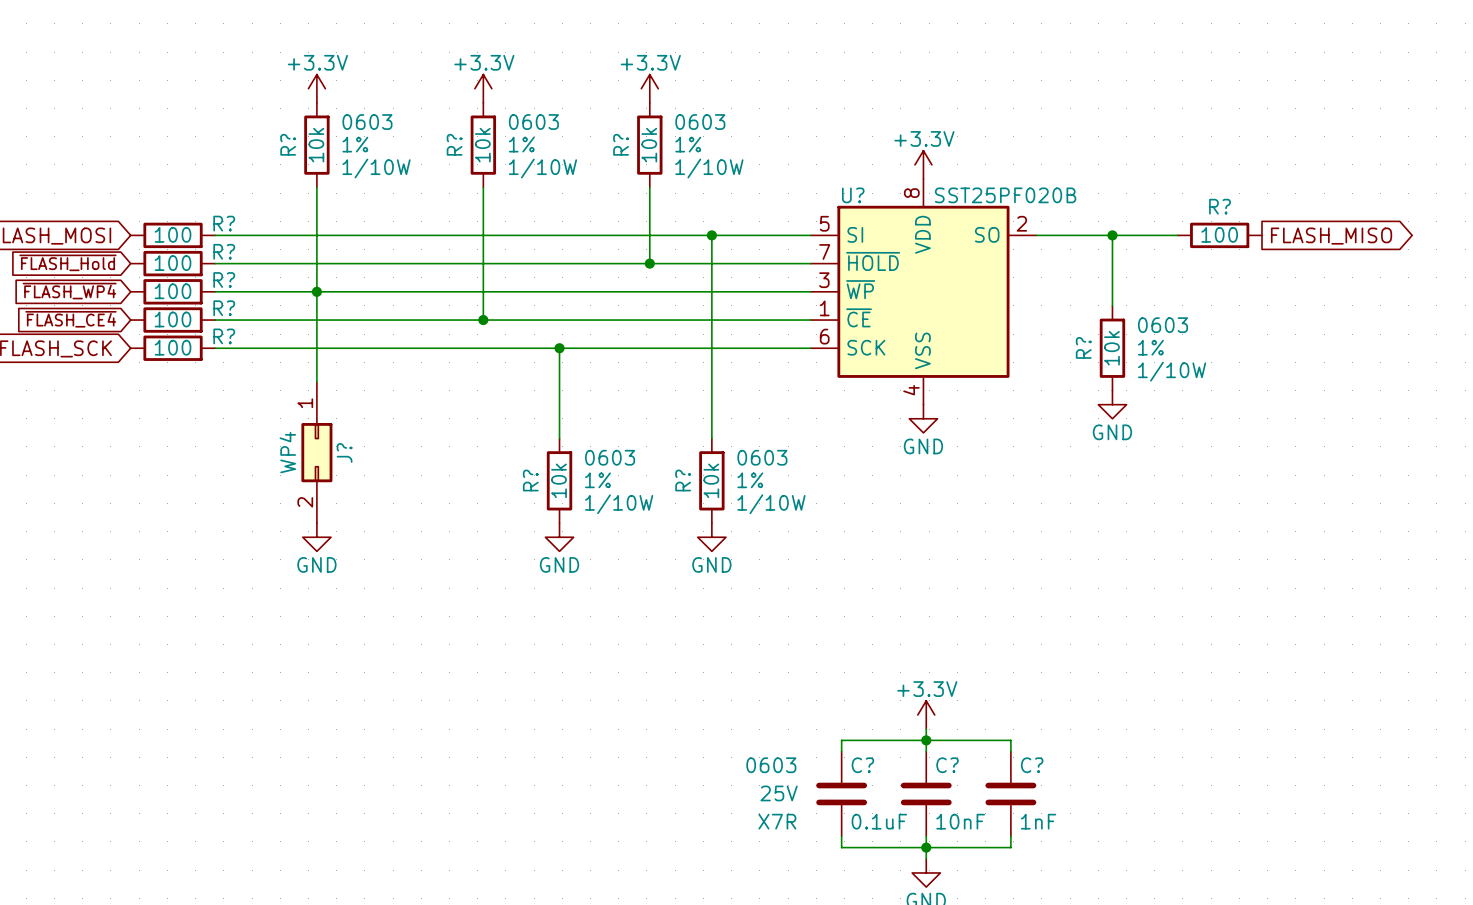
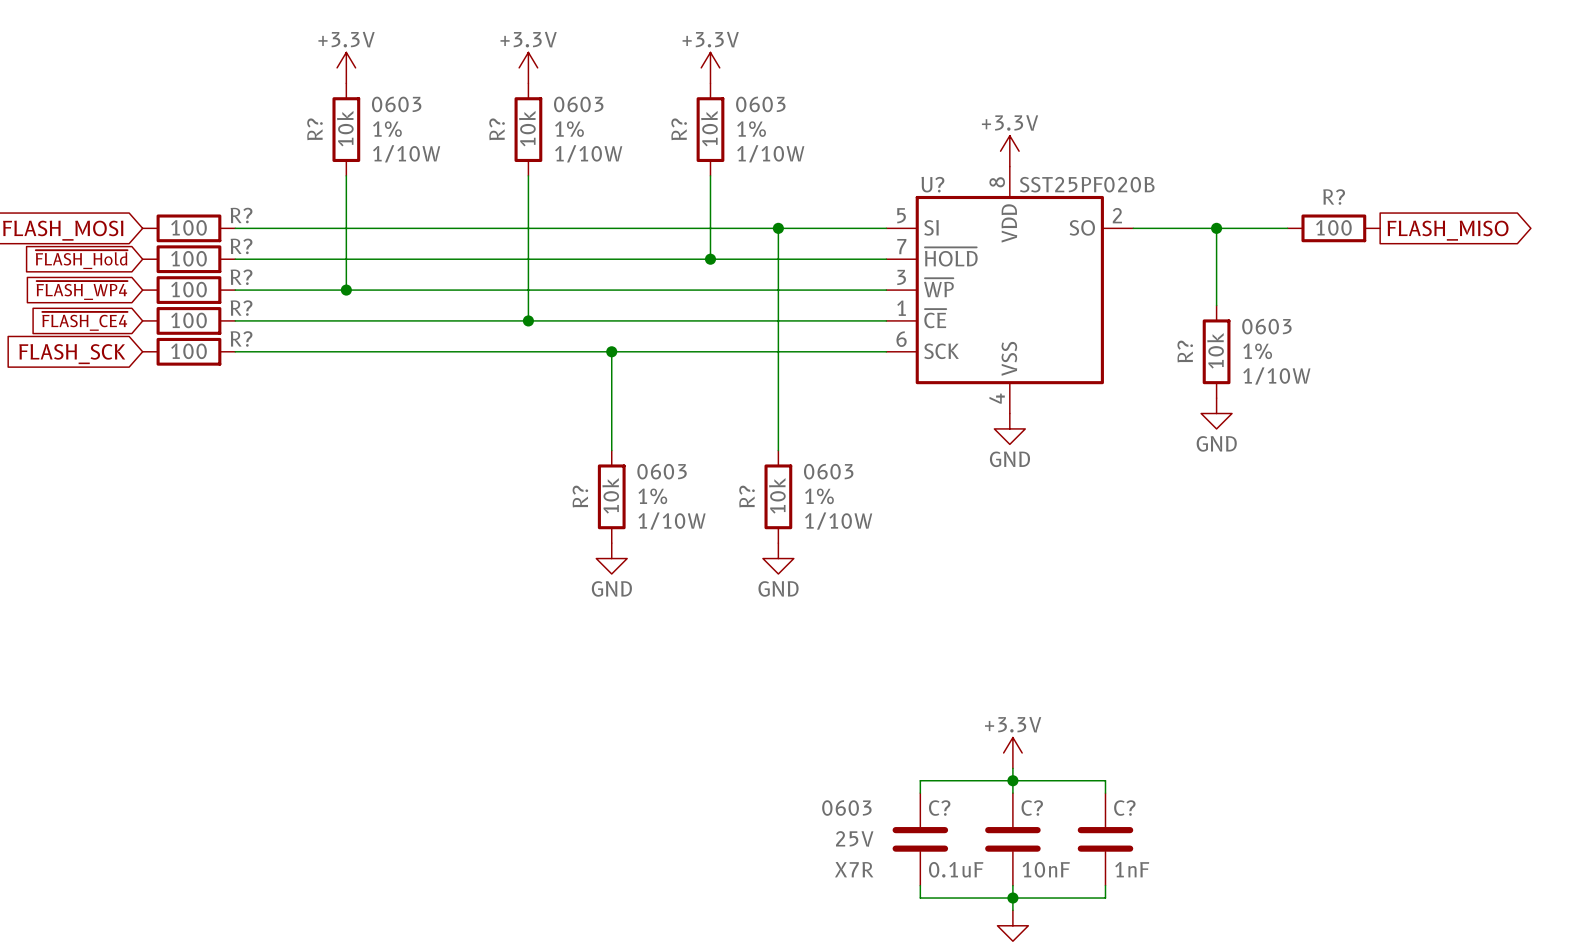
wire: (316, 291) (316, 382) -> none
J?: WP4 (316, 452) -> none
power symbol: GND (316, 537) -> none

